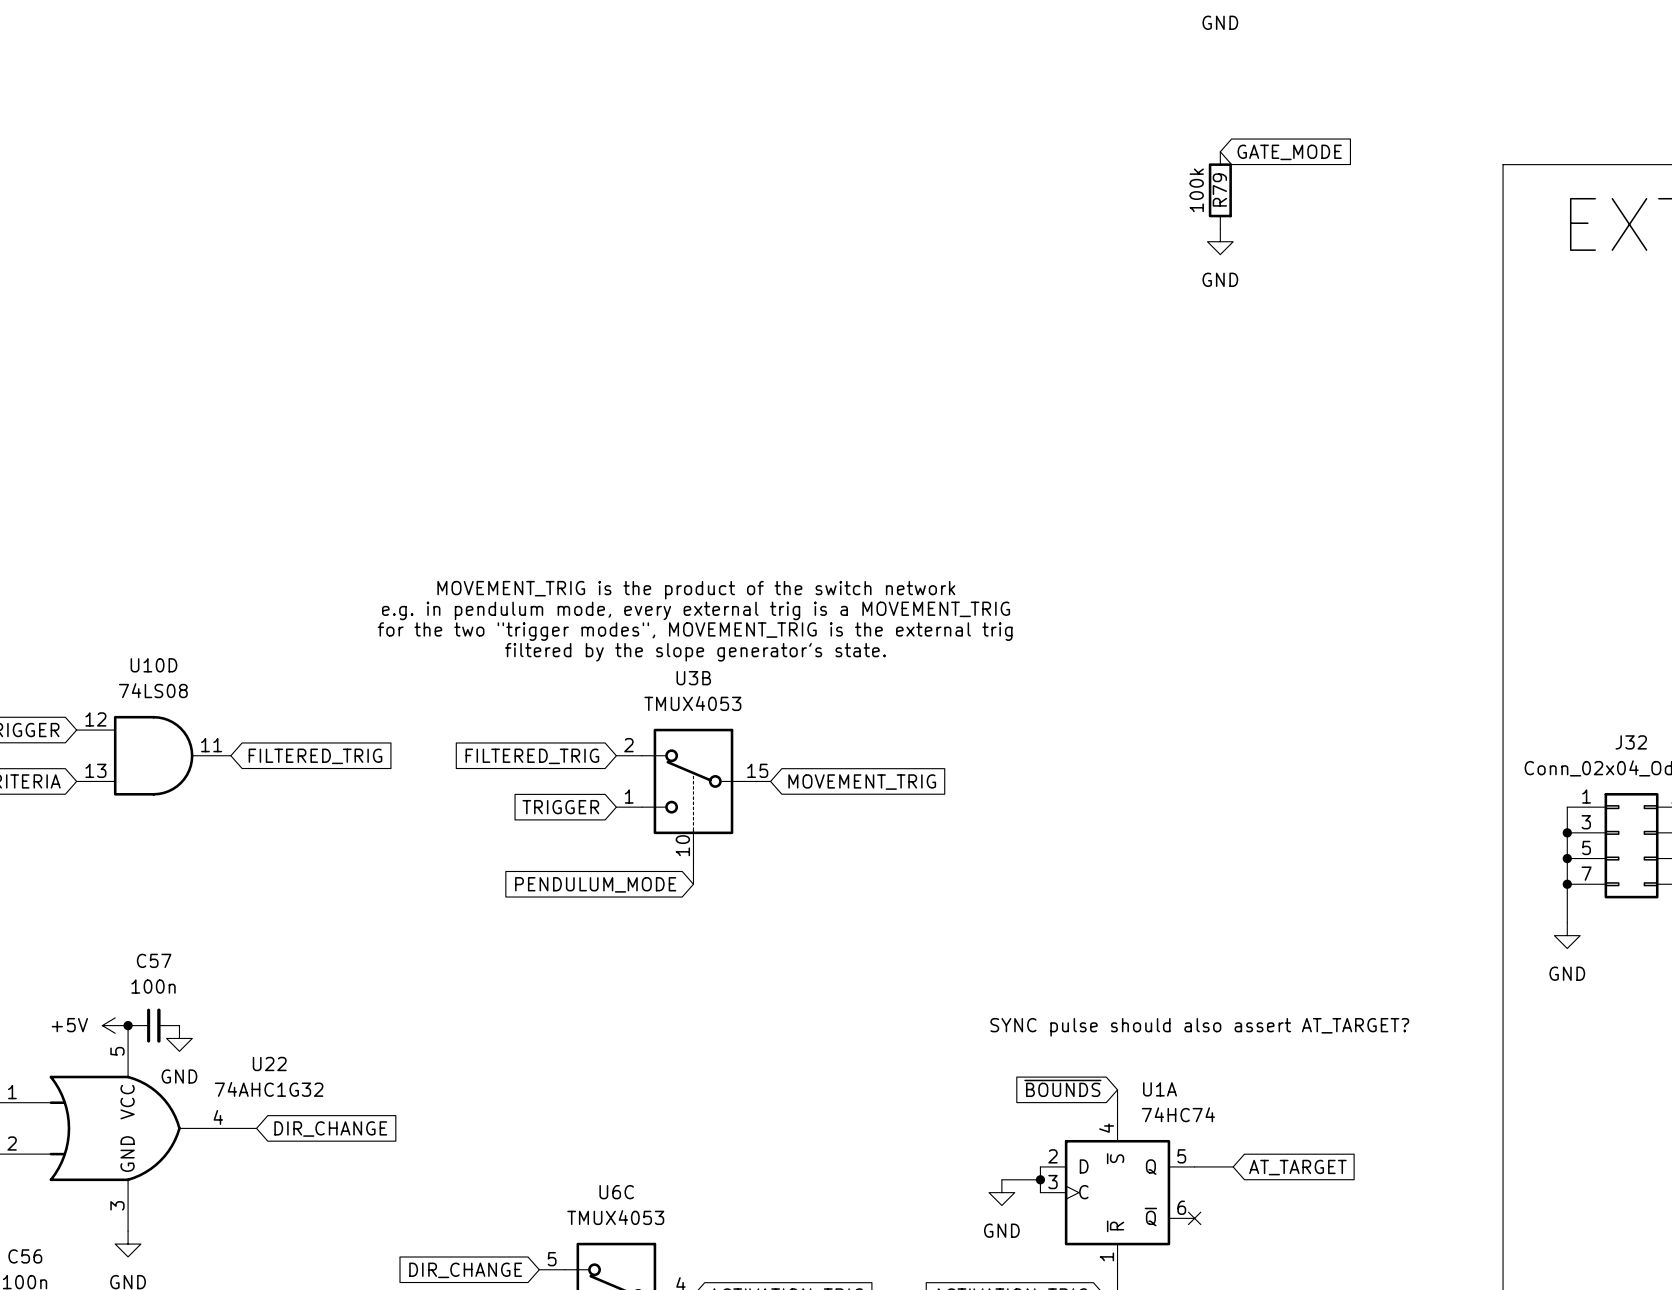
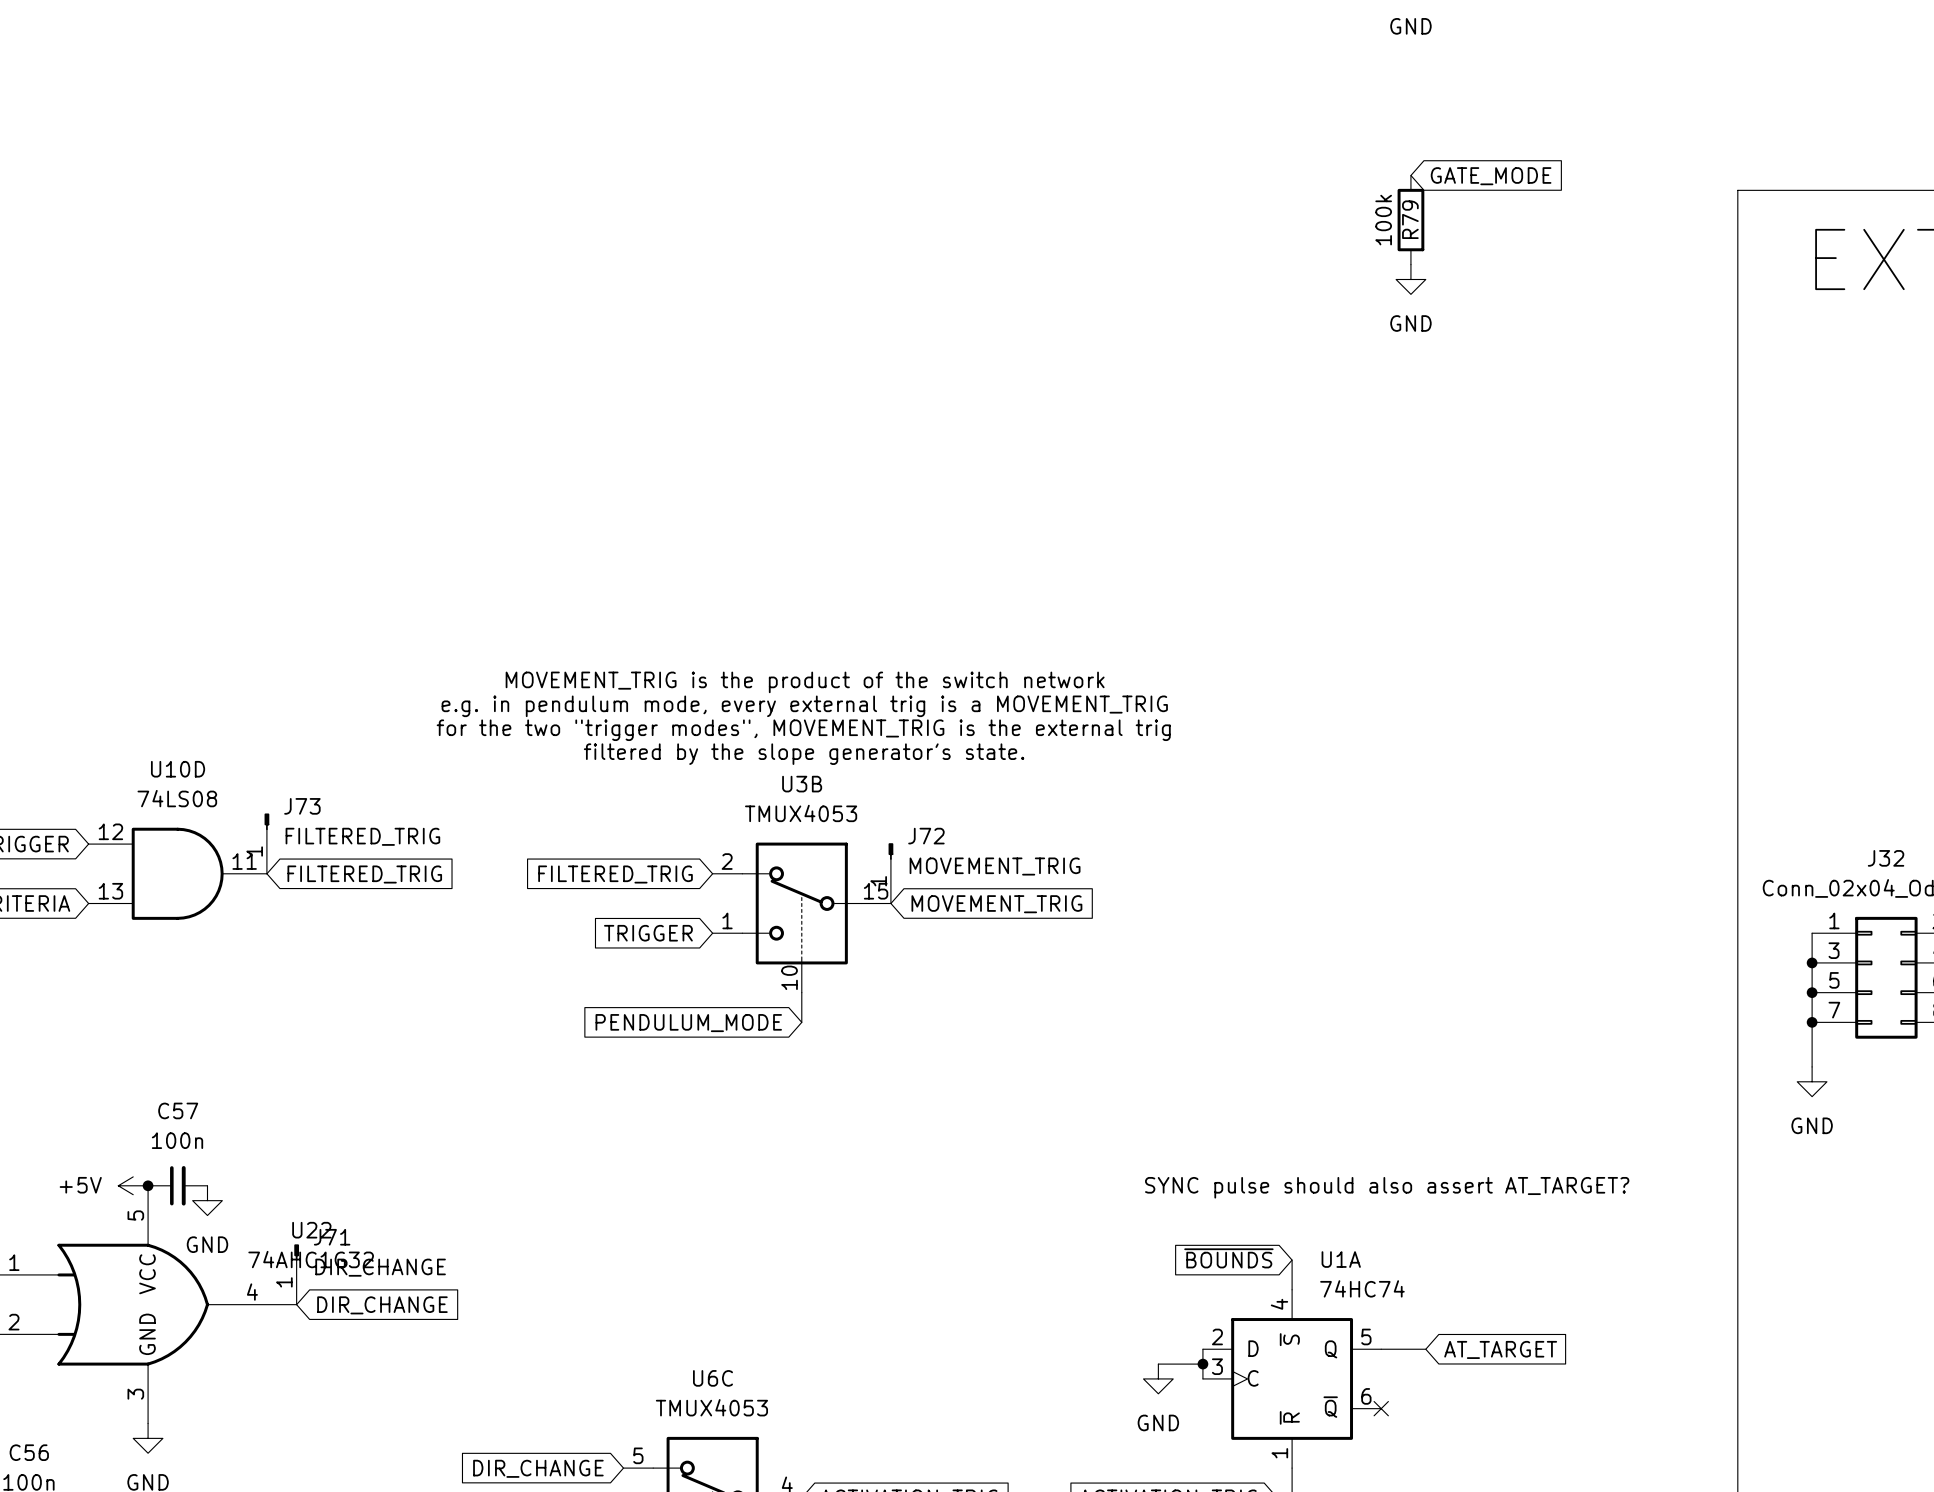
J73: none -> FILTERED_TRIG (266, 843)
J72: none -> MOVEMENT_TRIG (890, 873)
J71: none -> DIR_CHANGE (296, 1274)

